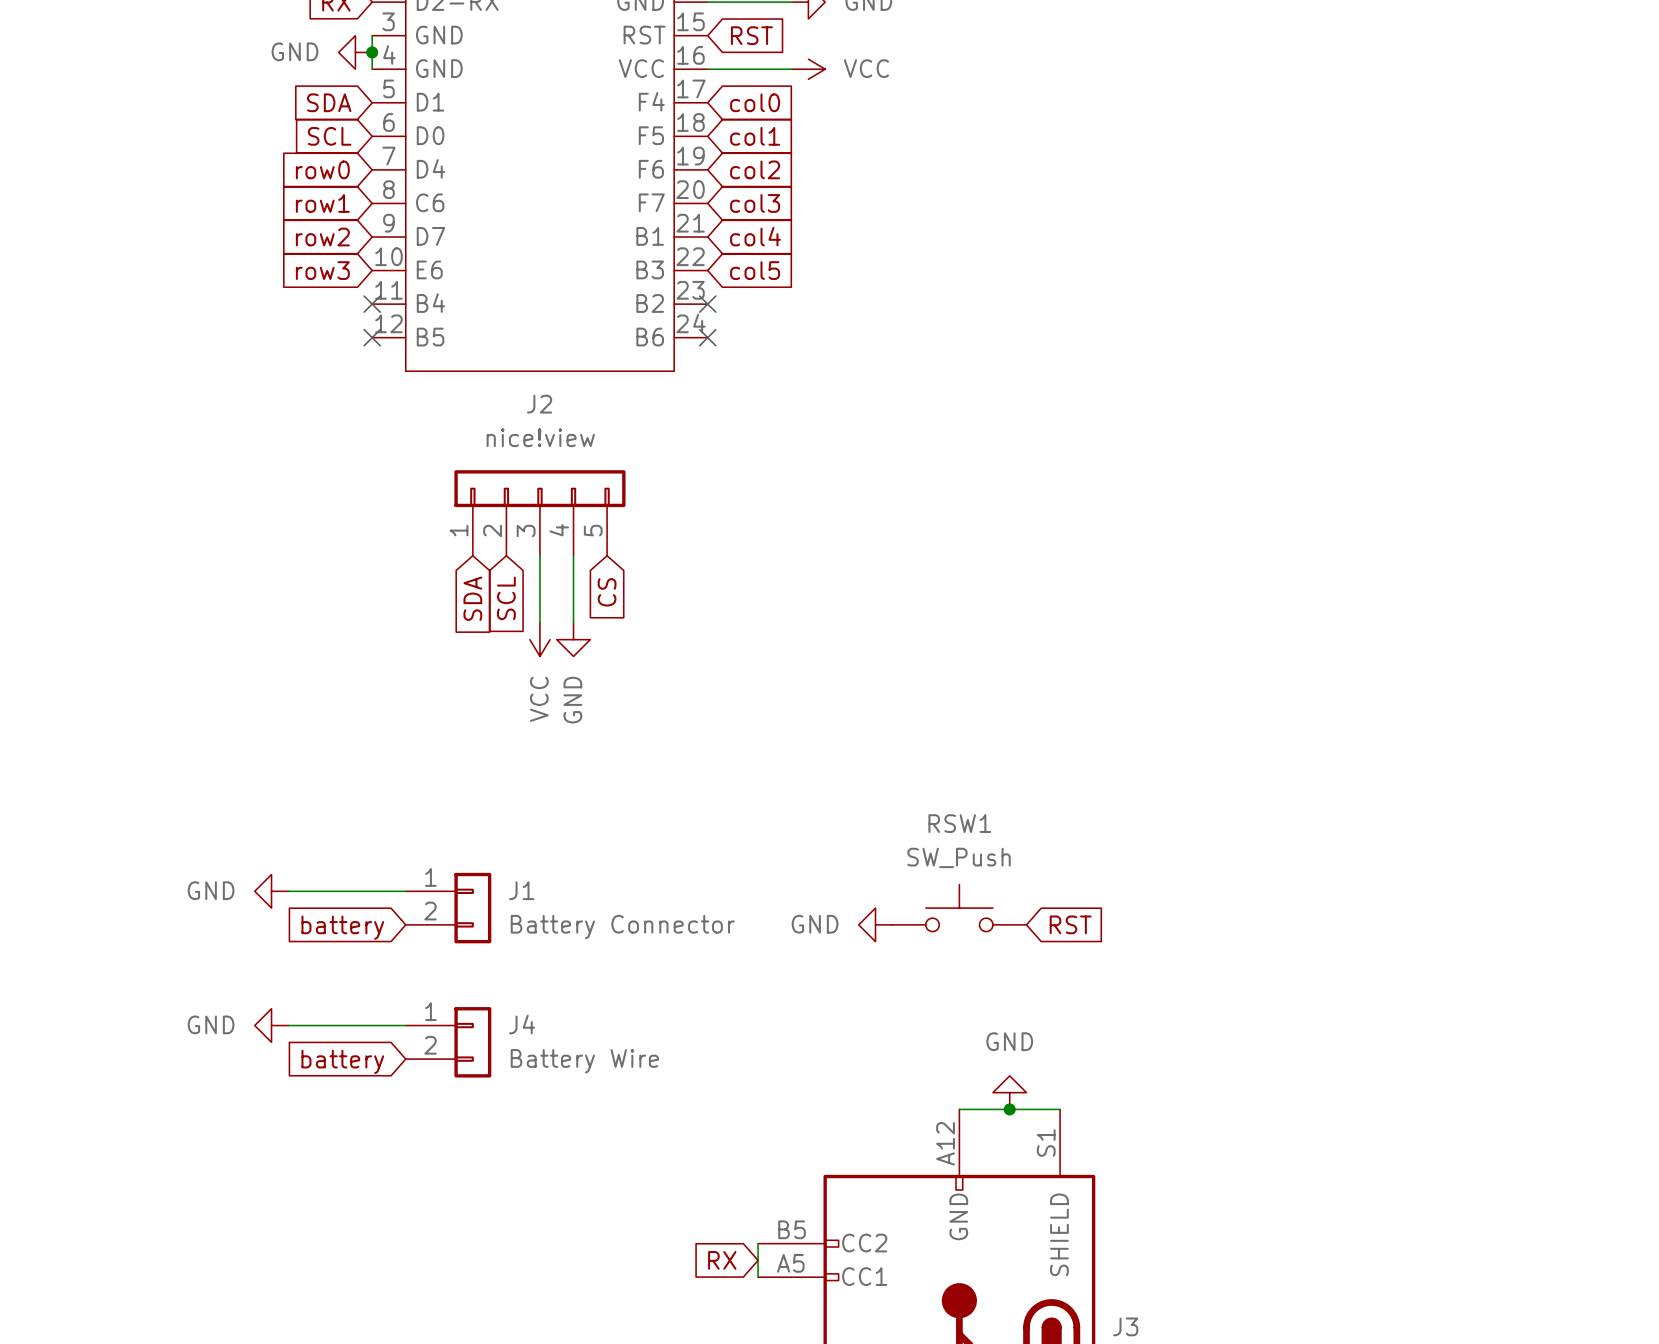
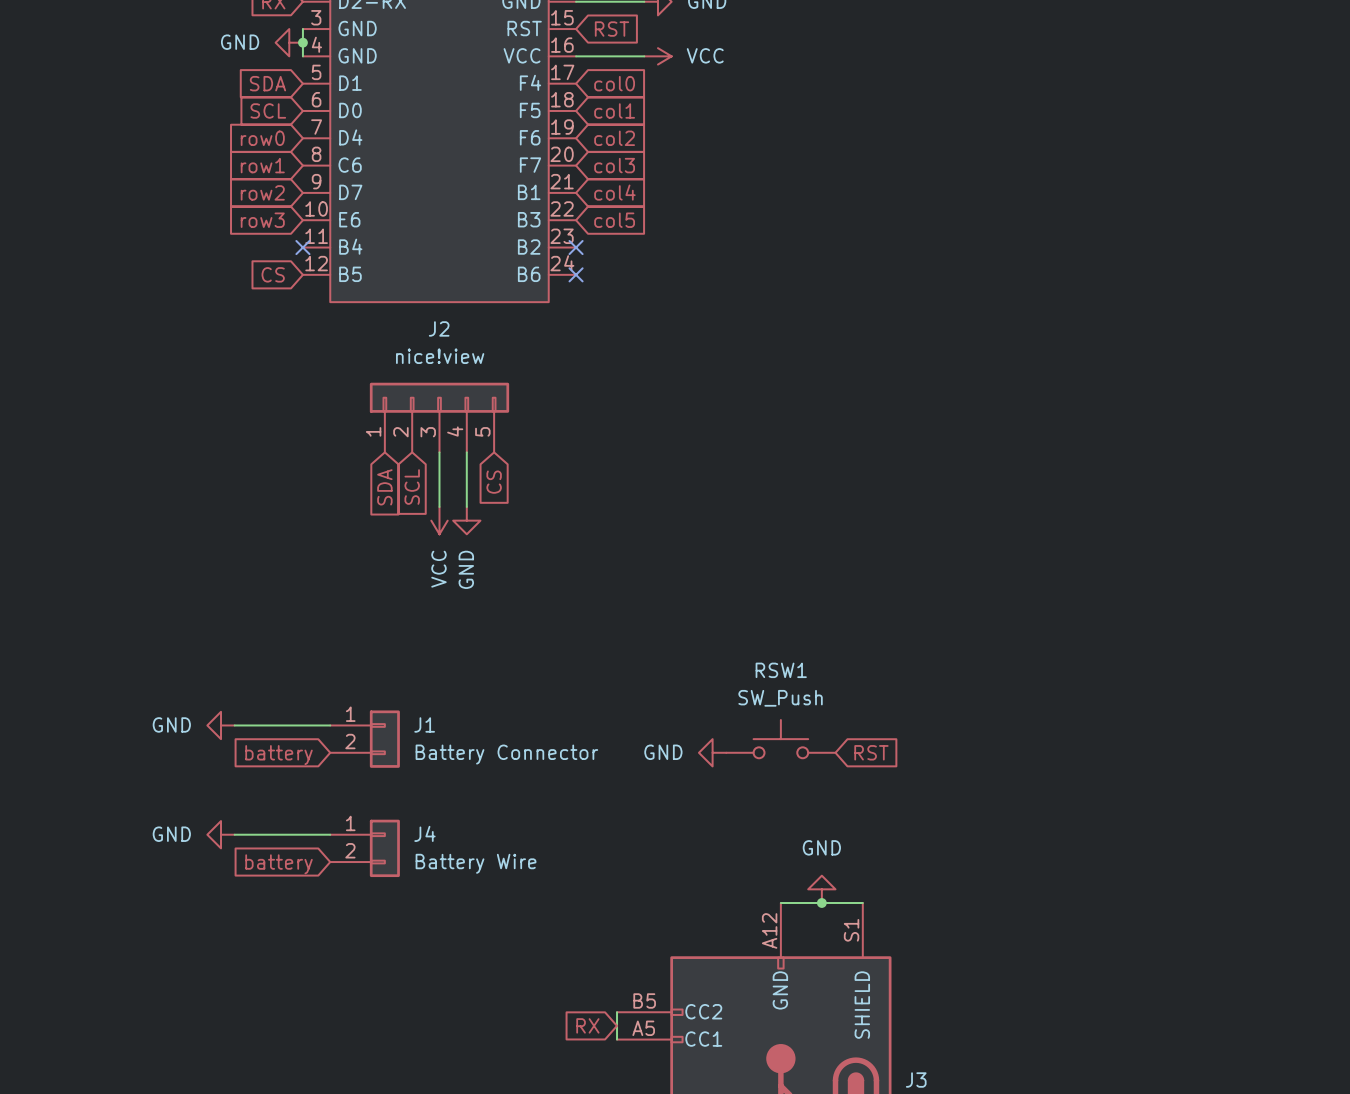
global label: none -> CS (273, 274)
no-connect mark: (372, 337) -> none

